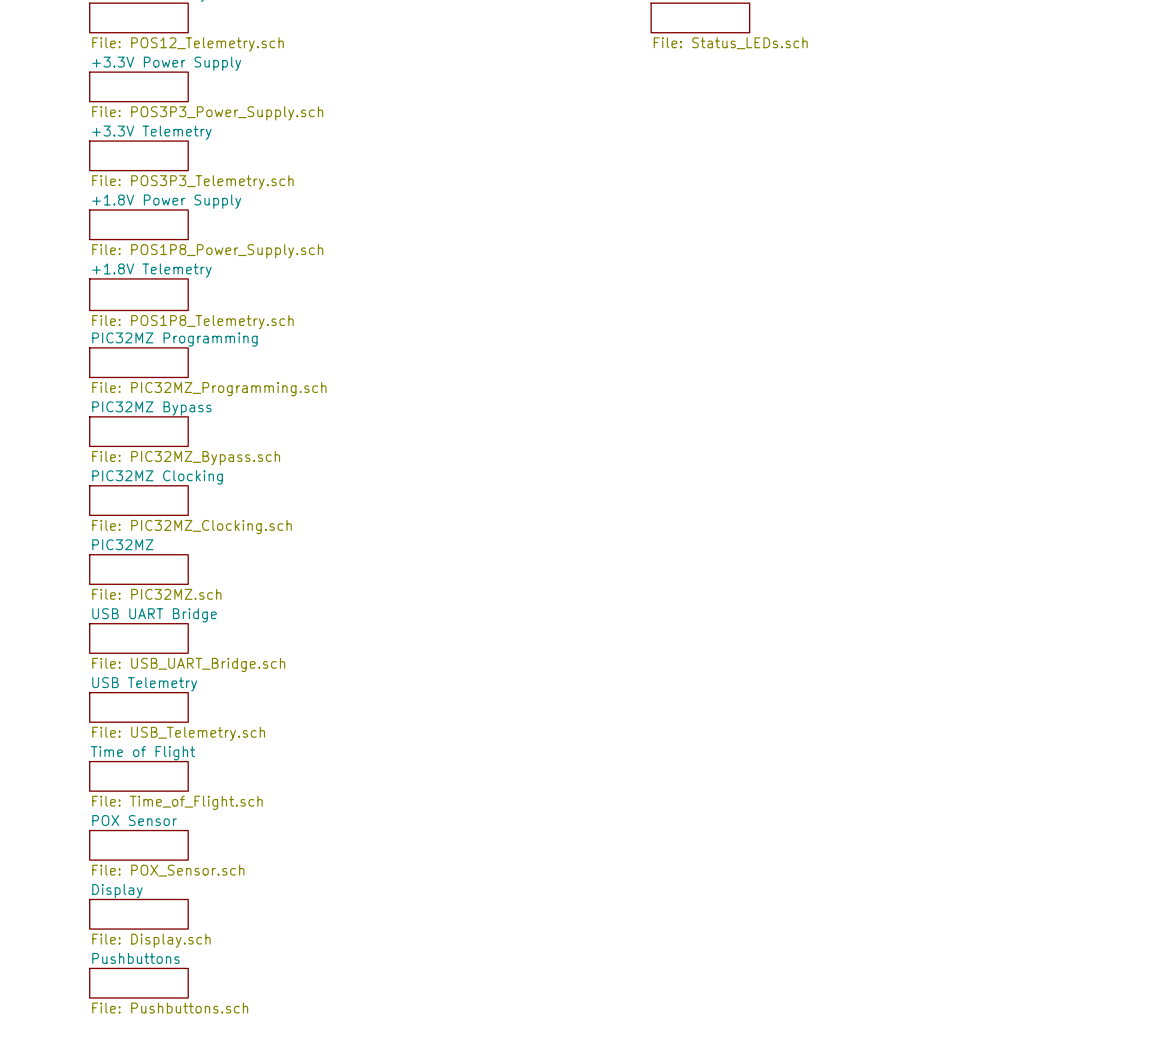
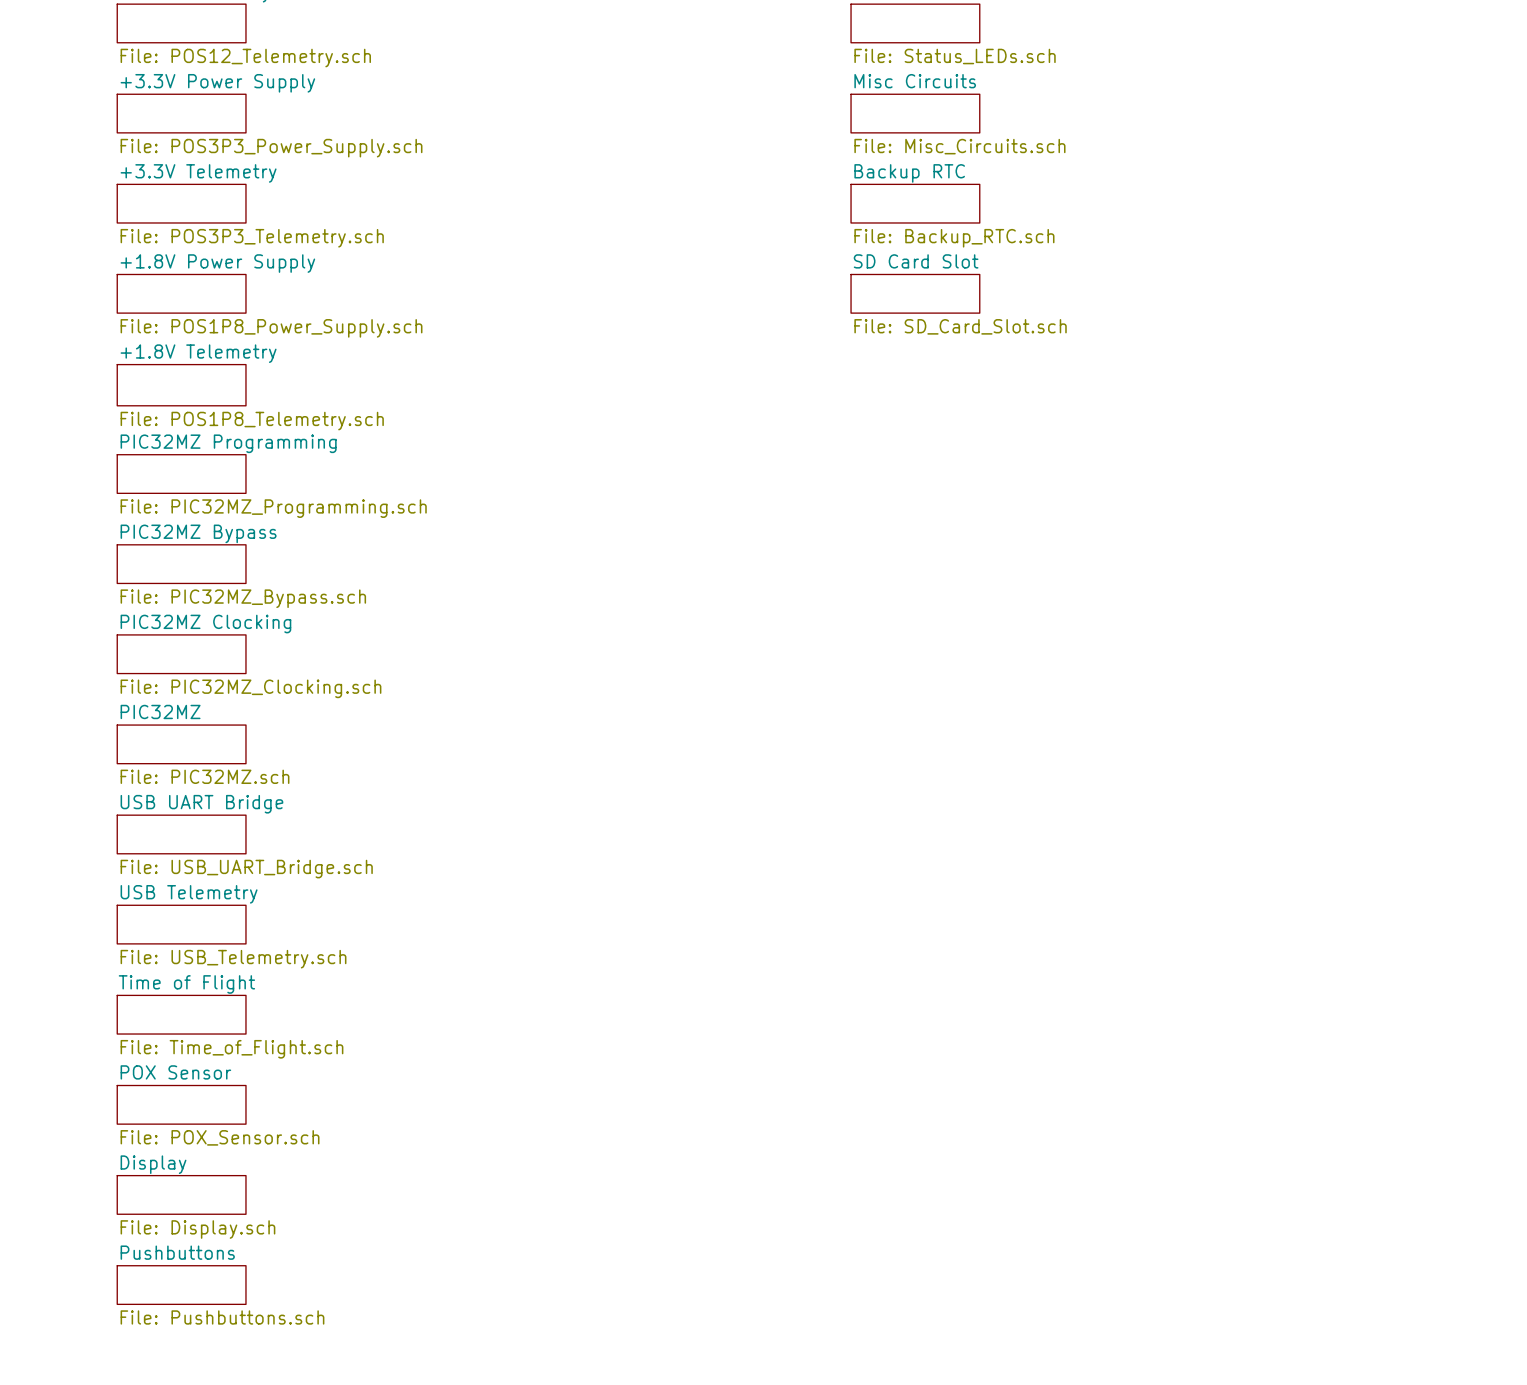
sheet Misc Circuits: none -> File: Misc_Circuits.sch (915, 113)
sheet Backup RTC: none -> File: Backup_RTC.sch (915, 203)
sheet SD Card Slot: none -> File: SD_Card_Slot.sch (915, 293)

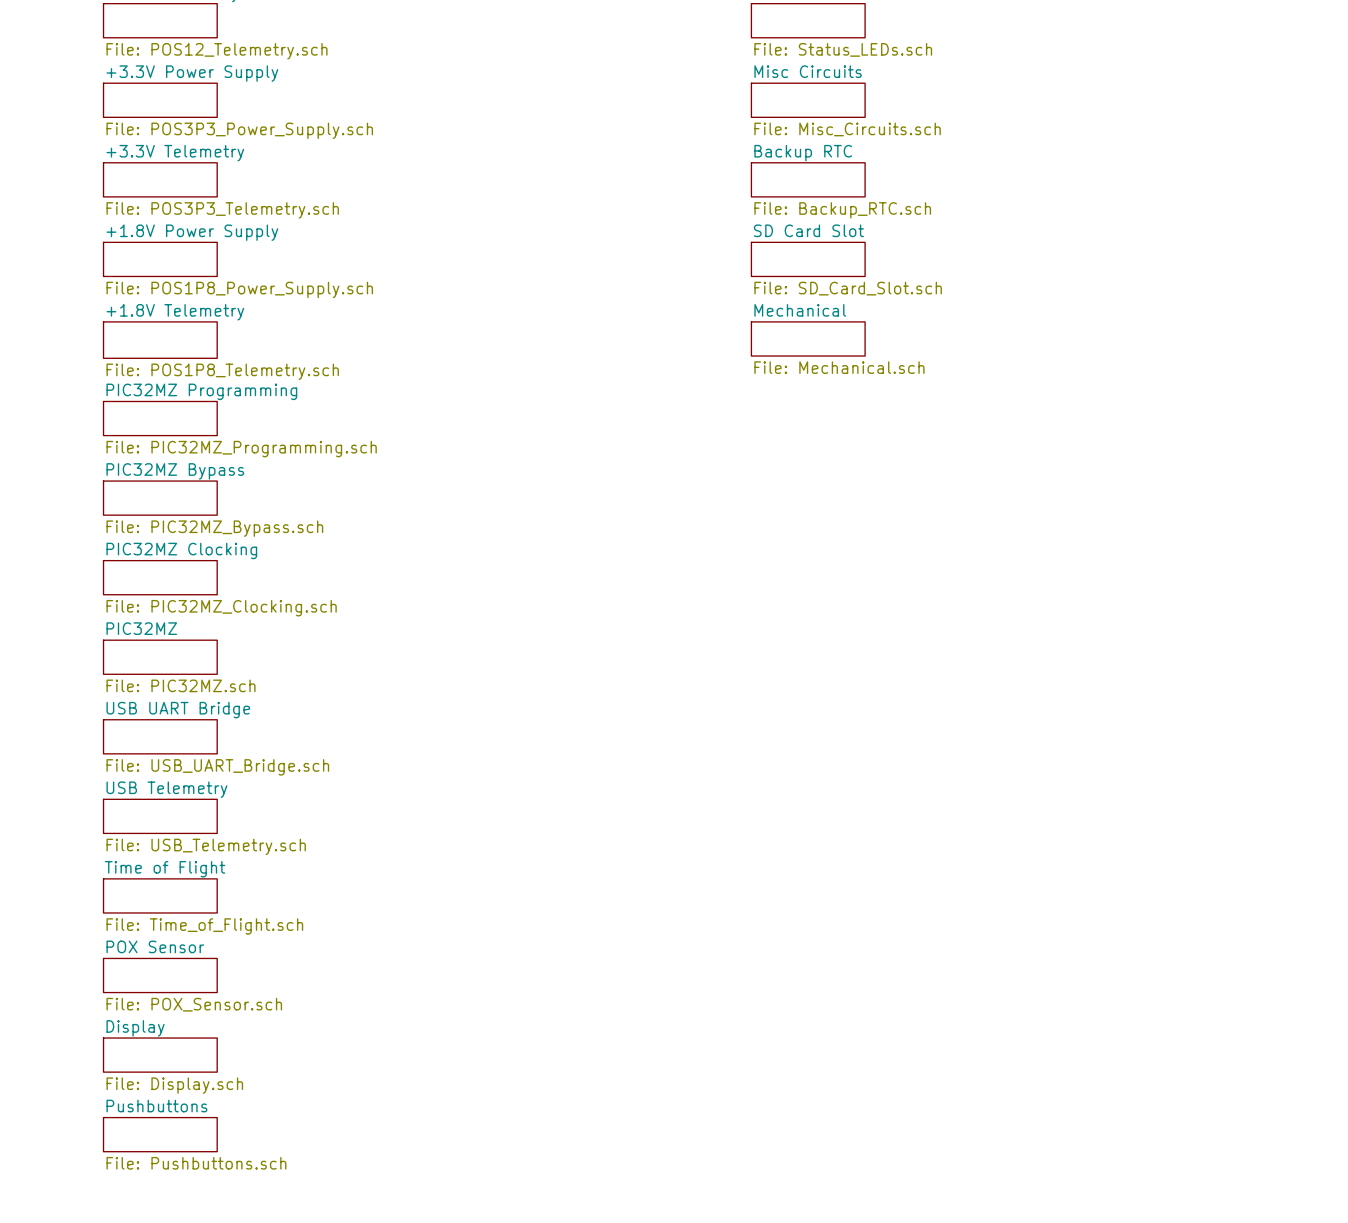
sheet Mechanical: none -> File: Mechanical.sch (808, 338)

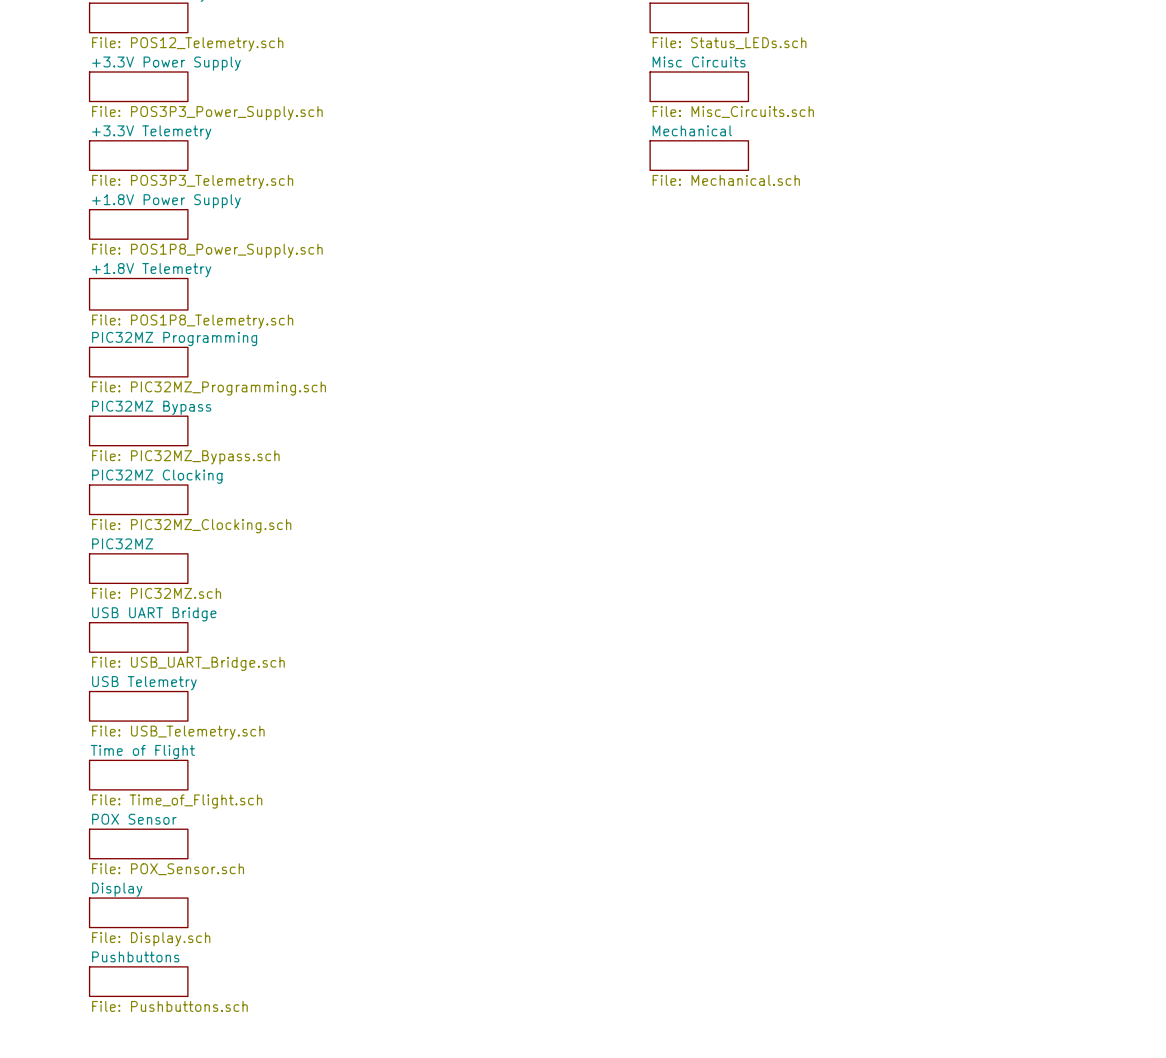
sheet Backup RTC name: Backup RTC (803, 153) -> Mechanical (692, 130)
sheet Backup RTC value: File: Backup_RTC.sch (842, 210) -> File: Mechanical.sch (726, 180)
sheet SD Card Slot: File: SD_Card_Slot.sch (808, 259) -> none
sheet Mechanical: File: Mechanical.sch (808, 338) -> none

